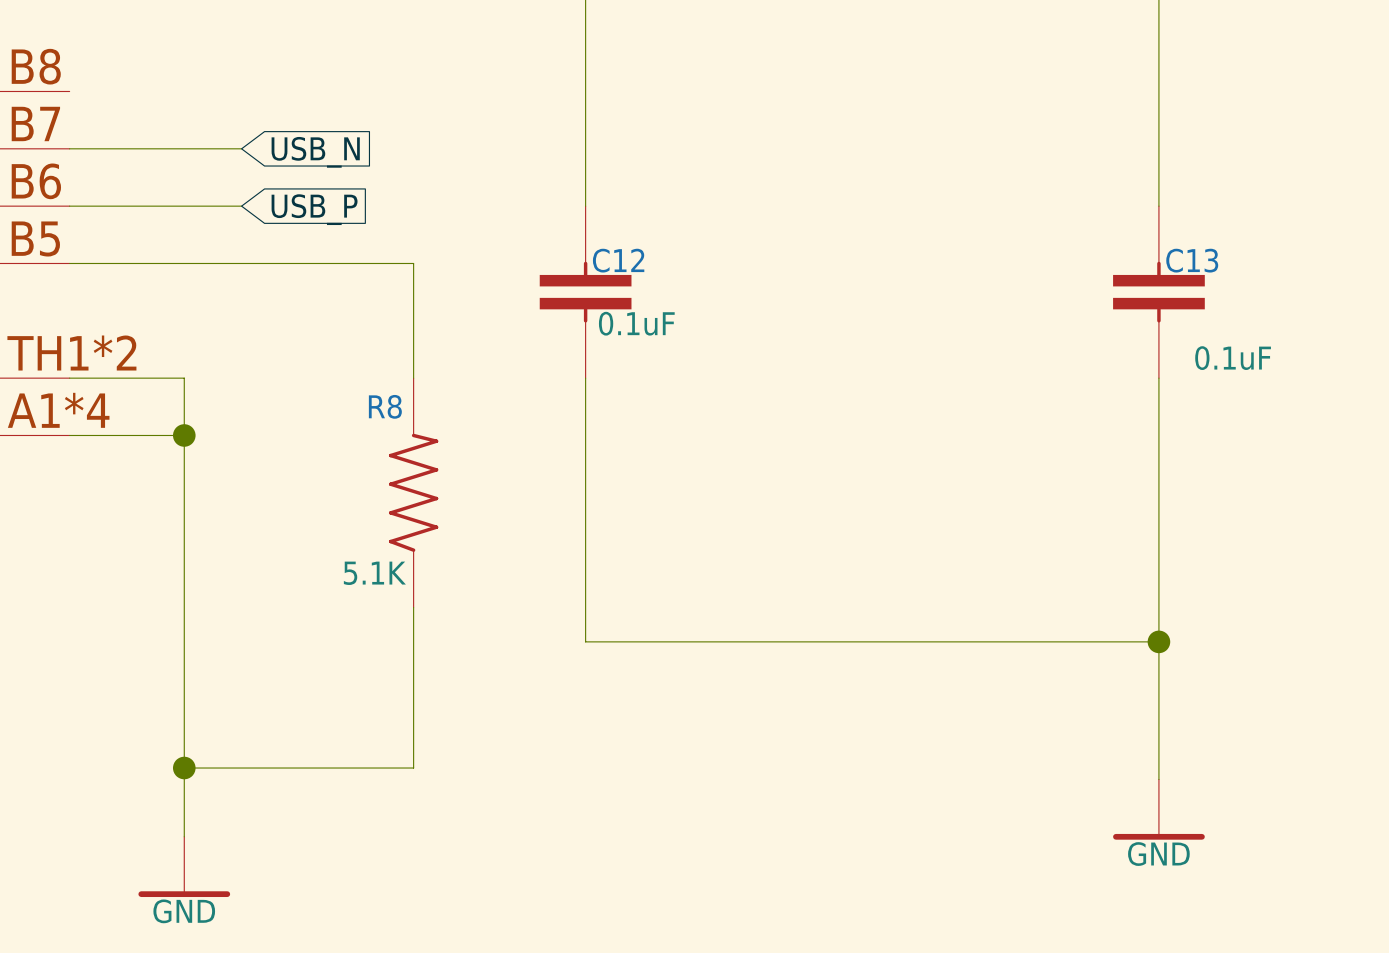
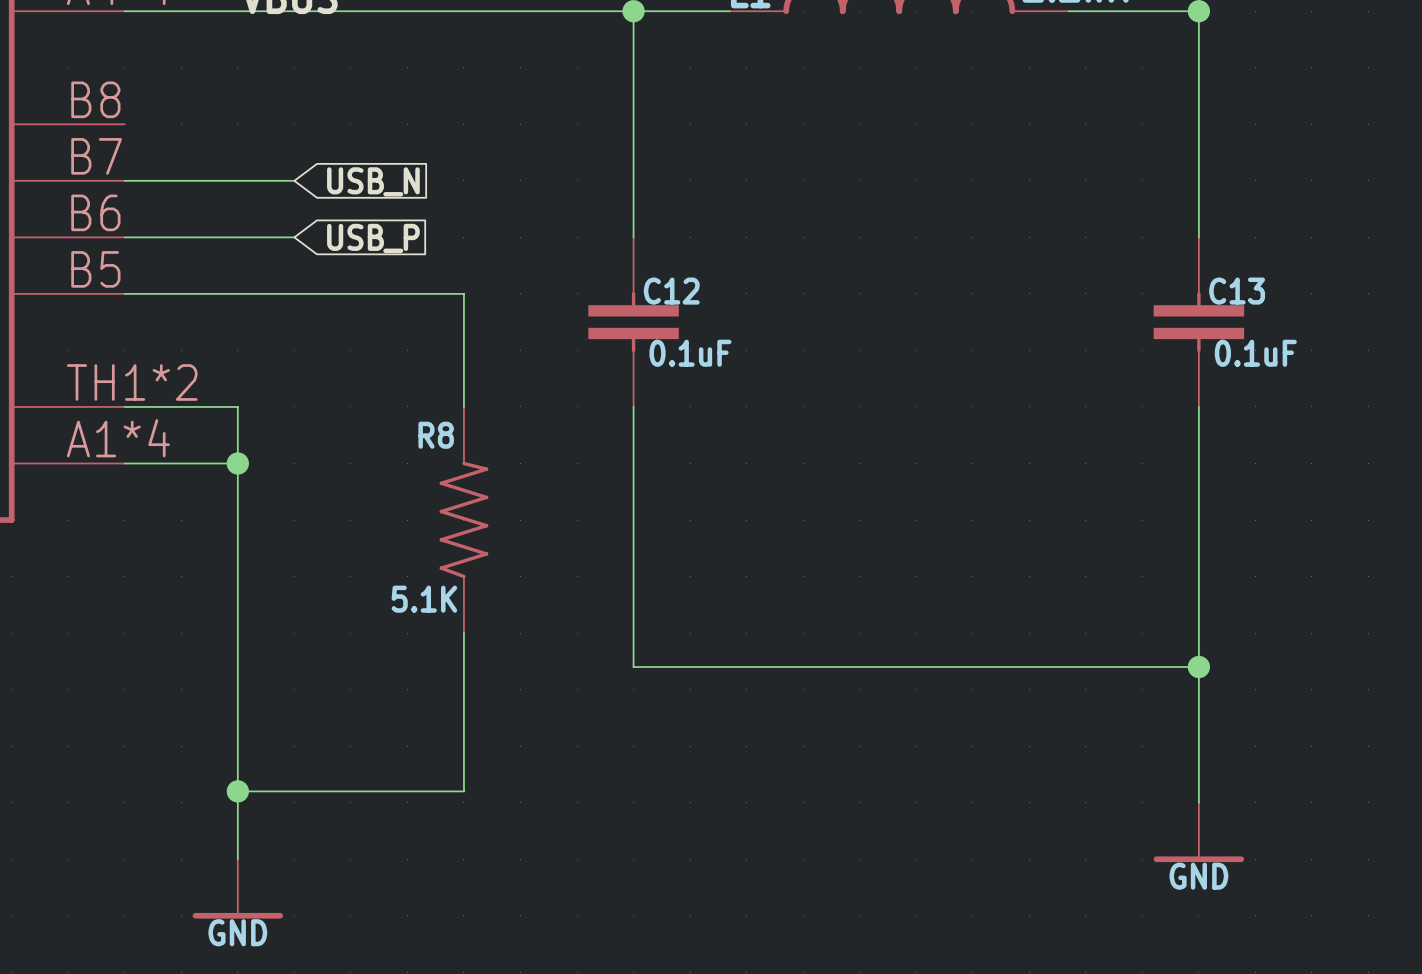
C13 value position: 0.1uF (1233, 358) -> 0.1uF (1255, 353)

